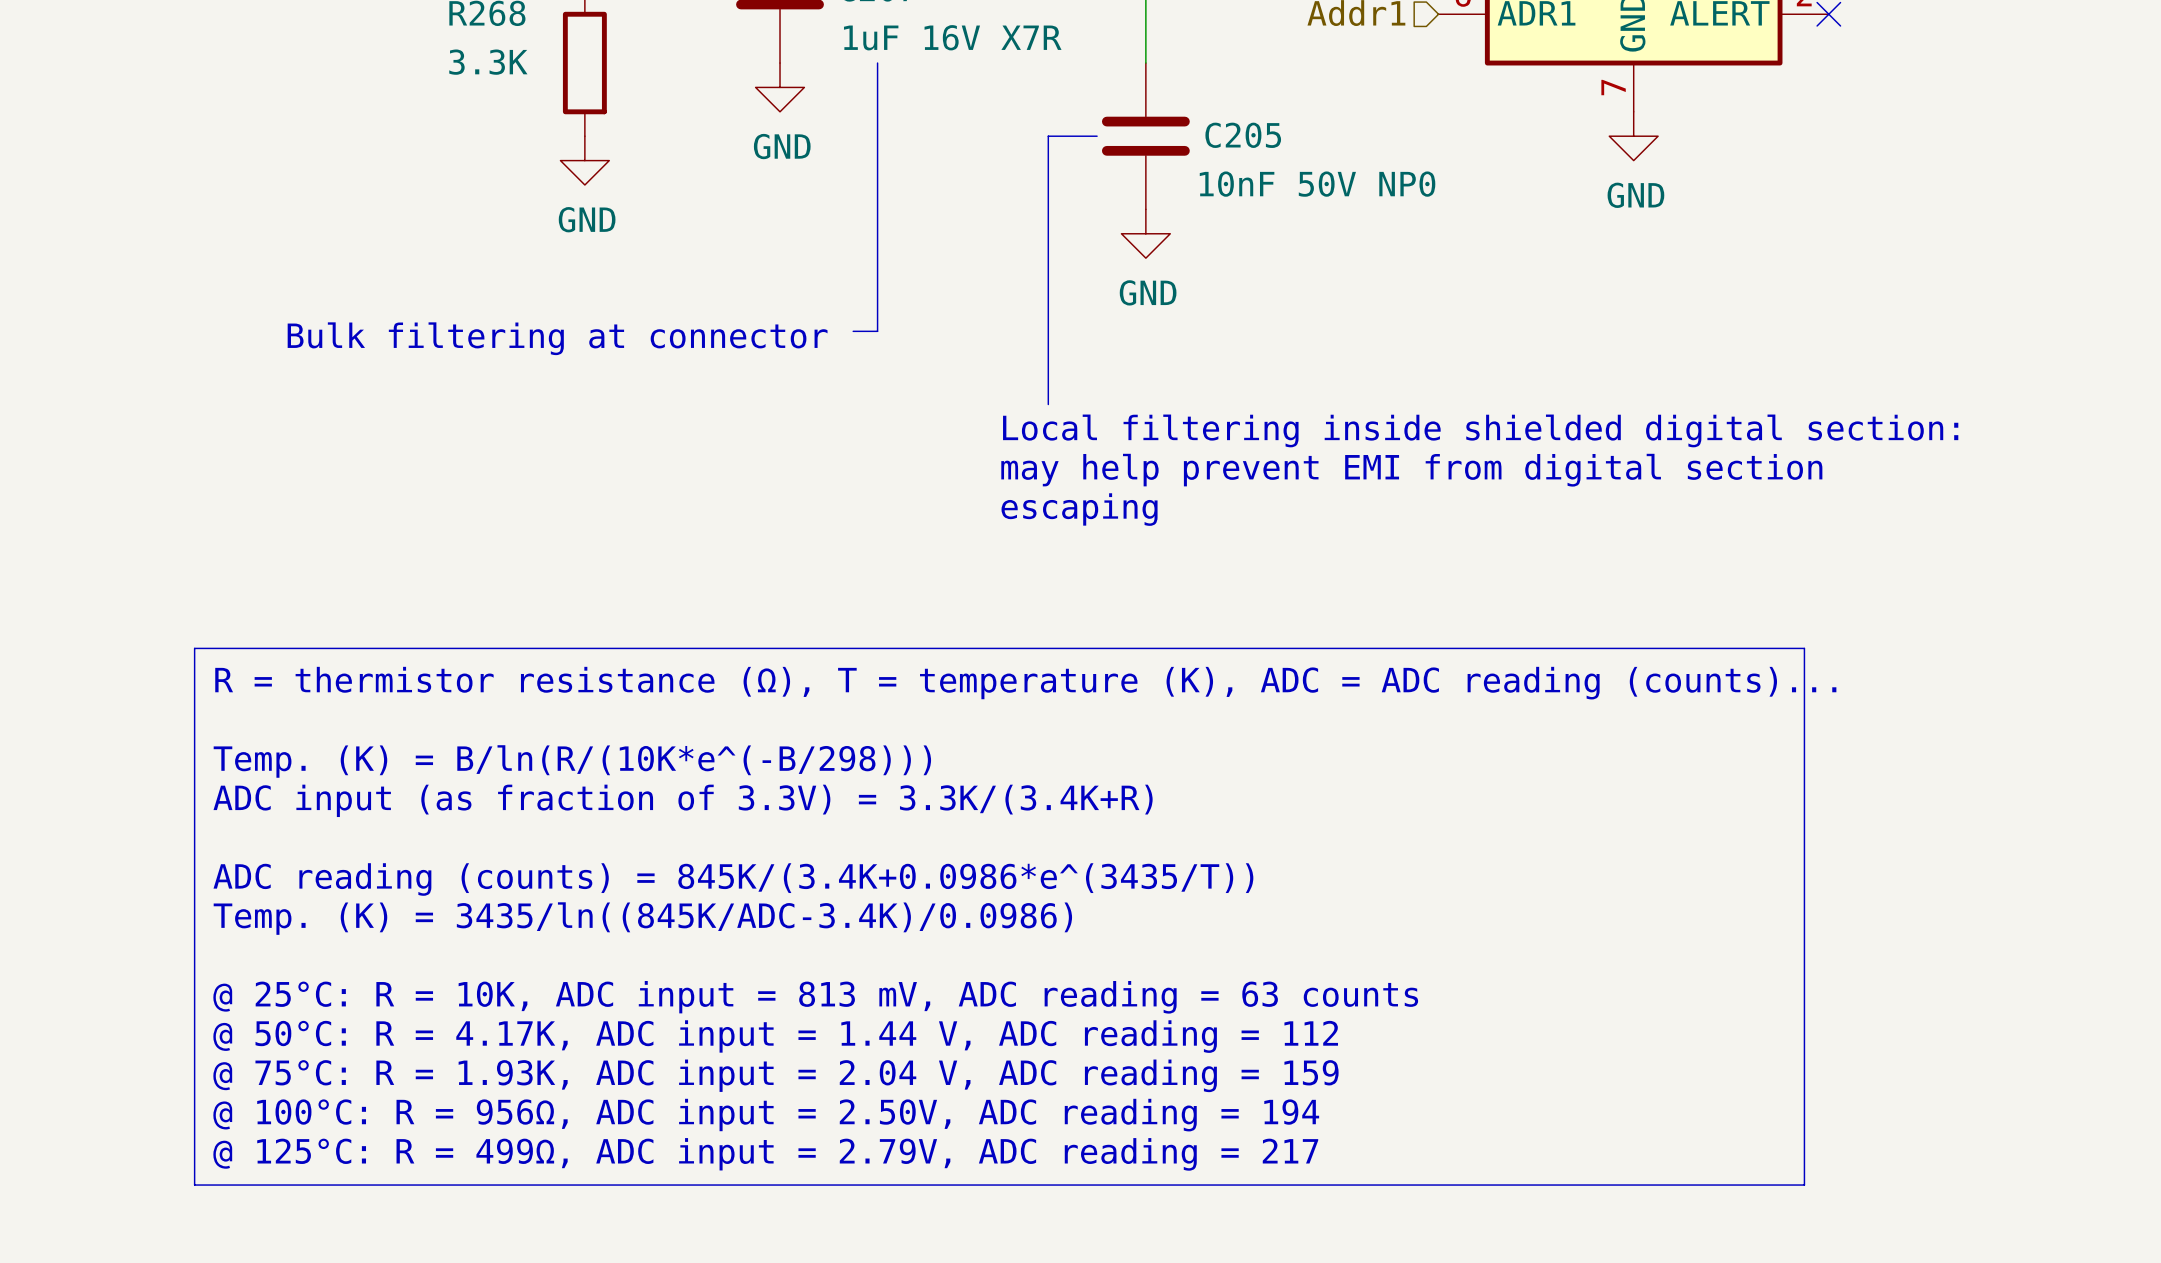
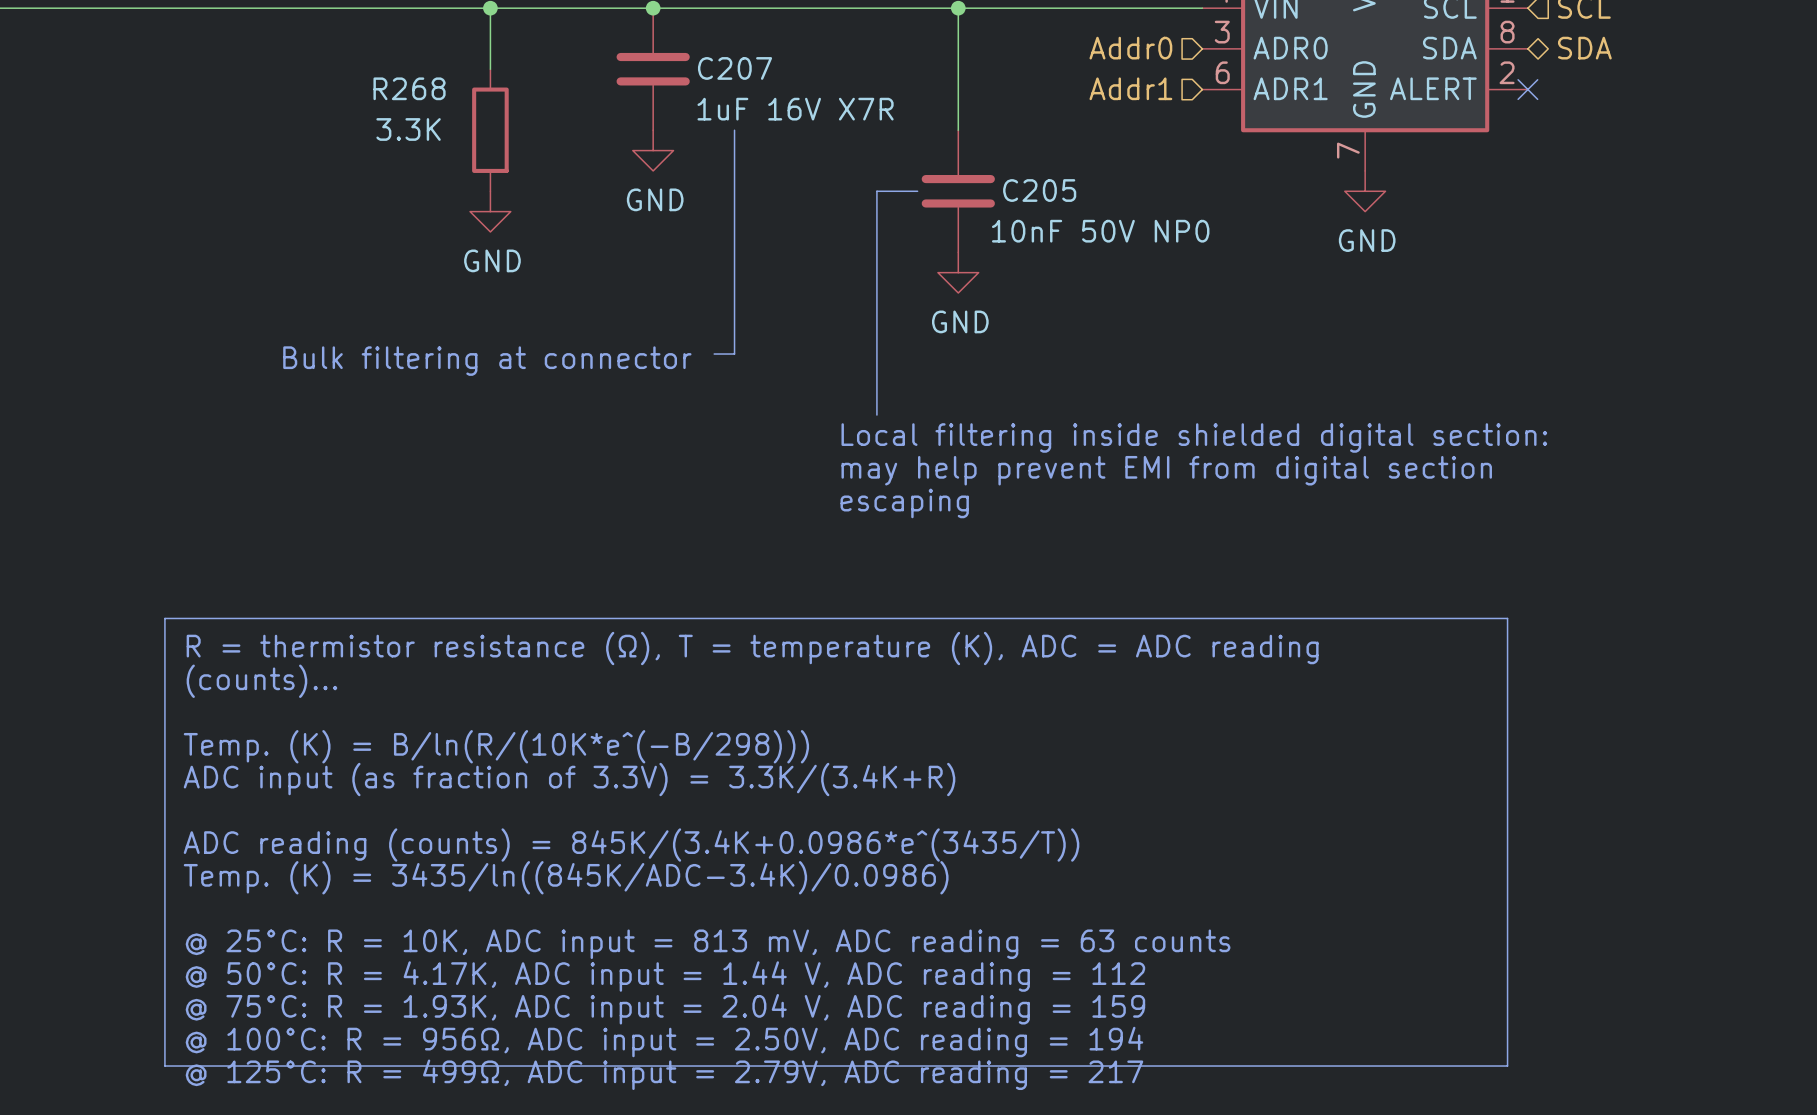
text: R = thermistor resistance (Ω), T = temperature (K), ADC = ADC reading (counts)... (1025, 683) -> R = thermistor resistance (Ω), T = temperature (K), ADC = ADC reading (752, 648)
text: none -> (counts)... (261, 681)
text position: Temp. (K) = B/ln(R/(10K*e^(-B/298))) (572, 761) -> Temp. (K) = B/ln(R/(10K*e^(-B/298))) (496, 746)
text position: ADC input (as fraction of 3.3V) = 3.3K/(3.4K+R) (683, 800) -> ADC input (as fraction of 3.3V) = 3.3K/(3.4K+R) (569, 779)
text position: ADC reading (counts) = 845K/(3.4K+0.0986*e^(3435/T)) (733, 879) -> ADC reading (counts) = 845K/(3.4K+0.0986*e^(3435/T)) (631, 845)
text position: Temp. (K) = 3435/ln((845K/ADC-3.4K)/0.0986) (642, 918) -> Temp. (K) = 3435/ln((845K/ADC-3.4K)/0.0986) (566, 877)
text position: @ 25°C: R = 10K, ADC input = 813 mV, ADC reading = 63 counts (815, 997) -> @ 25°C: R = 10K, ADC input = 813 mV, ADC reading = 63 counts (708, 944)
text position: @ 50°C: R = 4.17K, ADC input = 1.44 V, ADC reading = 112 (775, 1036) -> @ 50°C: R = 4.17K, ADC input = 1.44 V, ADC reading = 112 (665, 976)
text position: @ 75°C: R = 1.93K, ADC input = 2.04 V, ADC reading = 159 (775, 1075) -> @ 75°C: R = 1.93K, ADC input = 2.04 V, ADC reading = 159 (665, 1009)
text position: @ 100°C: R = 956Ω, ADC input = 2.50V, ADC reading = 194 (766, 1115) -> @ 100°C: R = 956Ω, ADC input = 2.50V, ADC reading = 194 (664, 1042)
text position: @ 125°C: R = 499Ω, ADC input = 2.79V, ADC reading = 217 (765, 1154) -> @ 125°C: R = 499Ω, ADC input = 2.79V, ADC reading = 217 (664, 1074)

